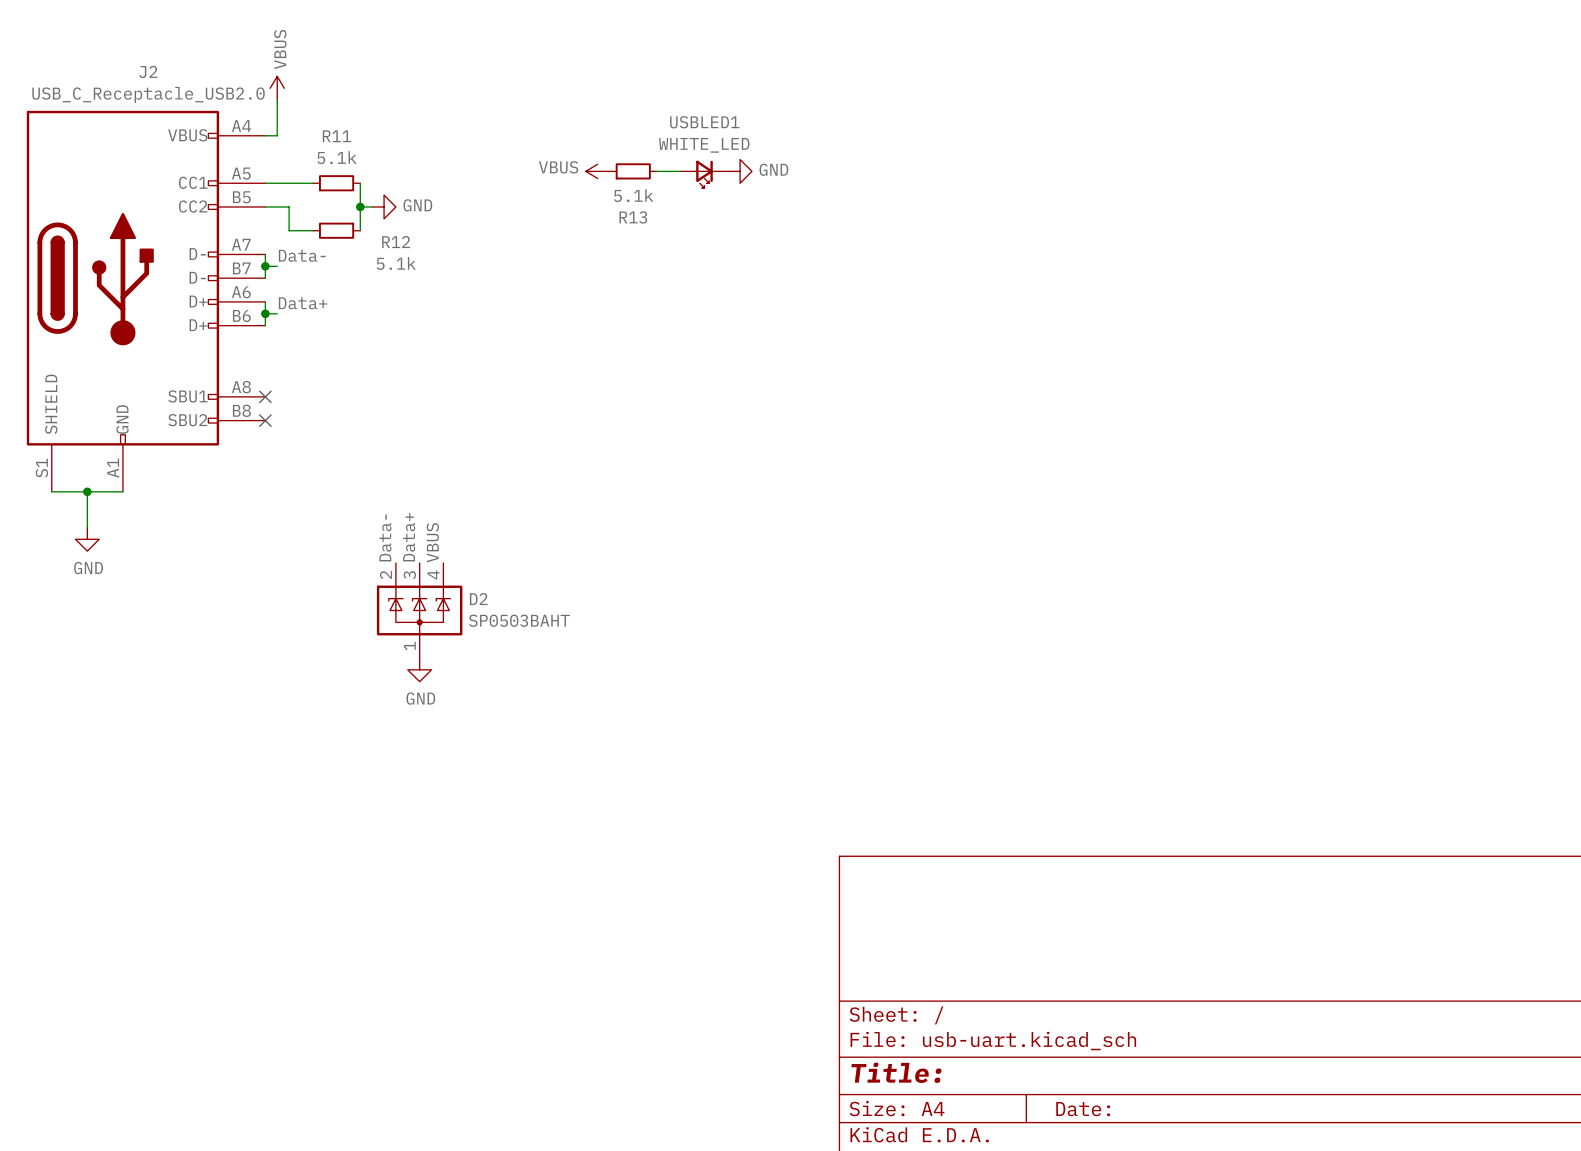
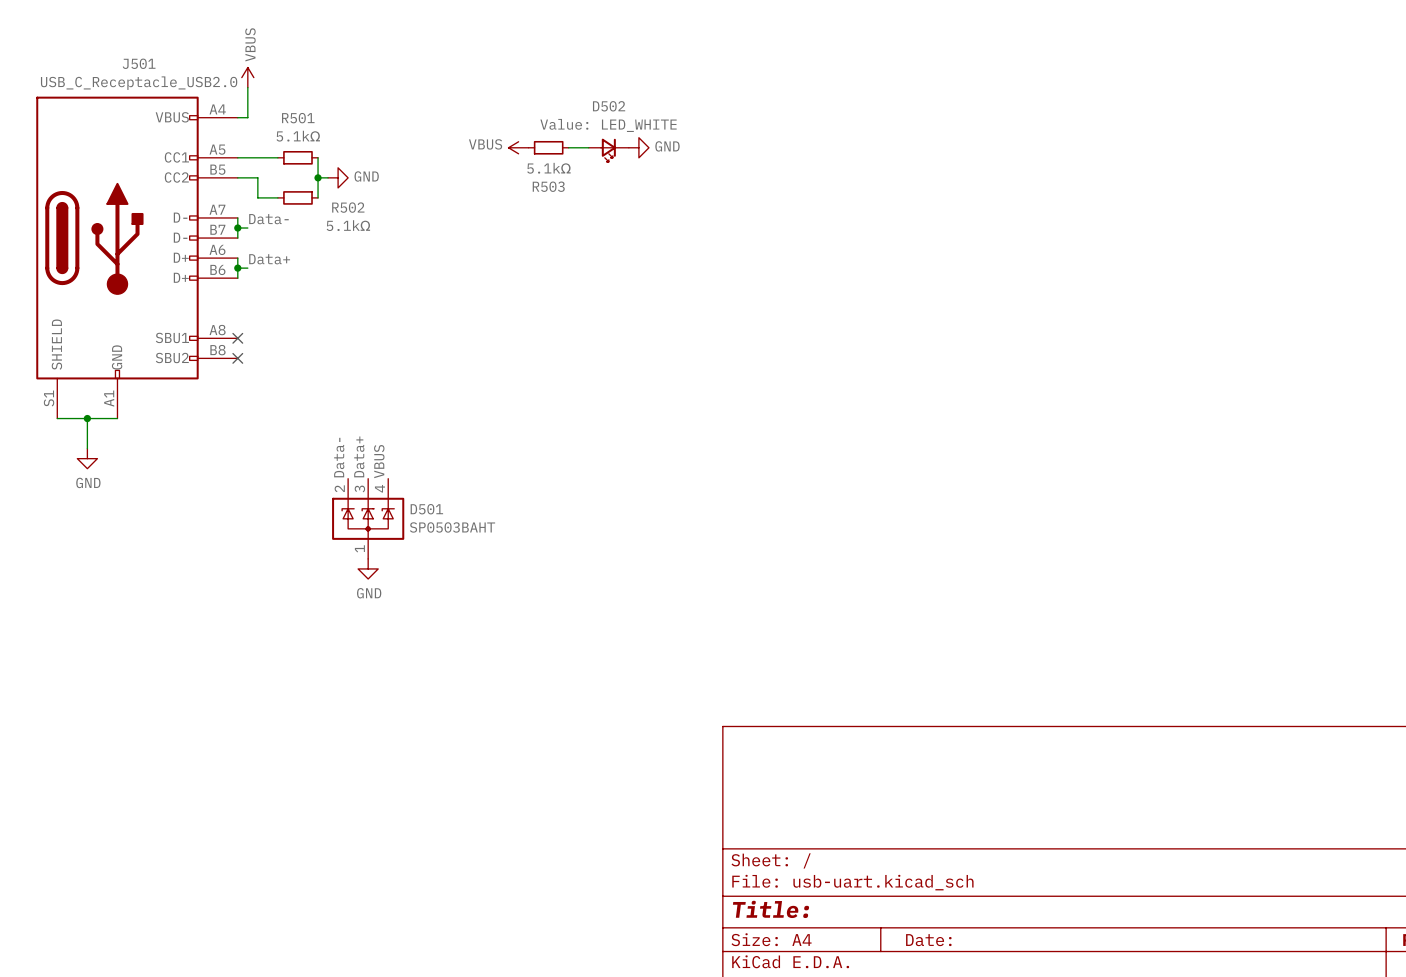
J2 name: J2 (148, 71) -> J501 (139, 63)
USBLED1 name: USBLED1 (704, 122) -> D502 (609, 106)
R11 name: R11 (336, 136) -> R501 (298, 118)
USBLED1 value: WHITE_LED (704, 145) -> Value: LED_WHITE (608, 125)
R11 value: 5.1k (336, 157) -> 5.1kΩ (298, 136)
R13 value: 5.1k (633, 195) -> 5.1kΩ (548, 168)
R13 name: R13 (633, 217) -> R503 (548, 186)
R12 name: R12 (396, 242) -> R502 (348, 207)
R12 value: 5.1k (396, 263) -> 5.1kΩ (348, 225)
D2 name: D2 (478, 599) -> D501 (426, 509)

